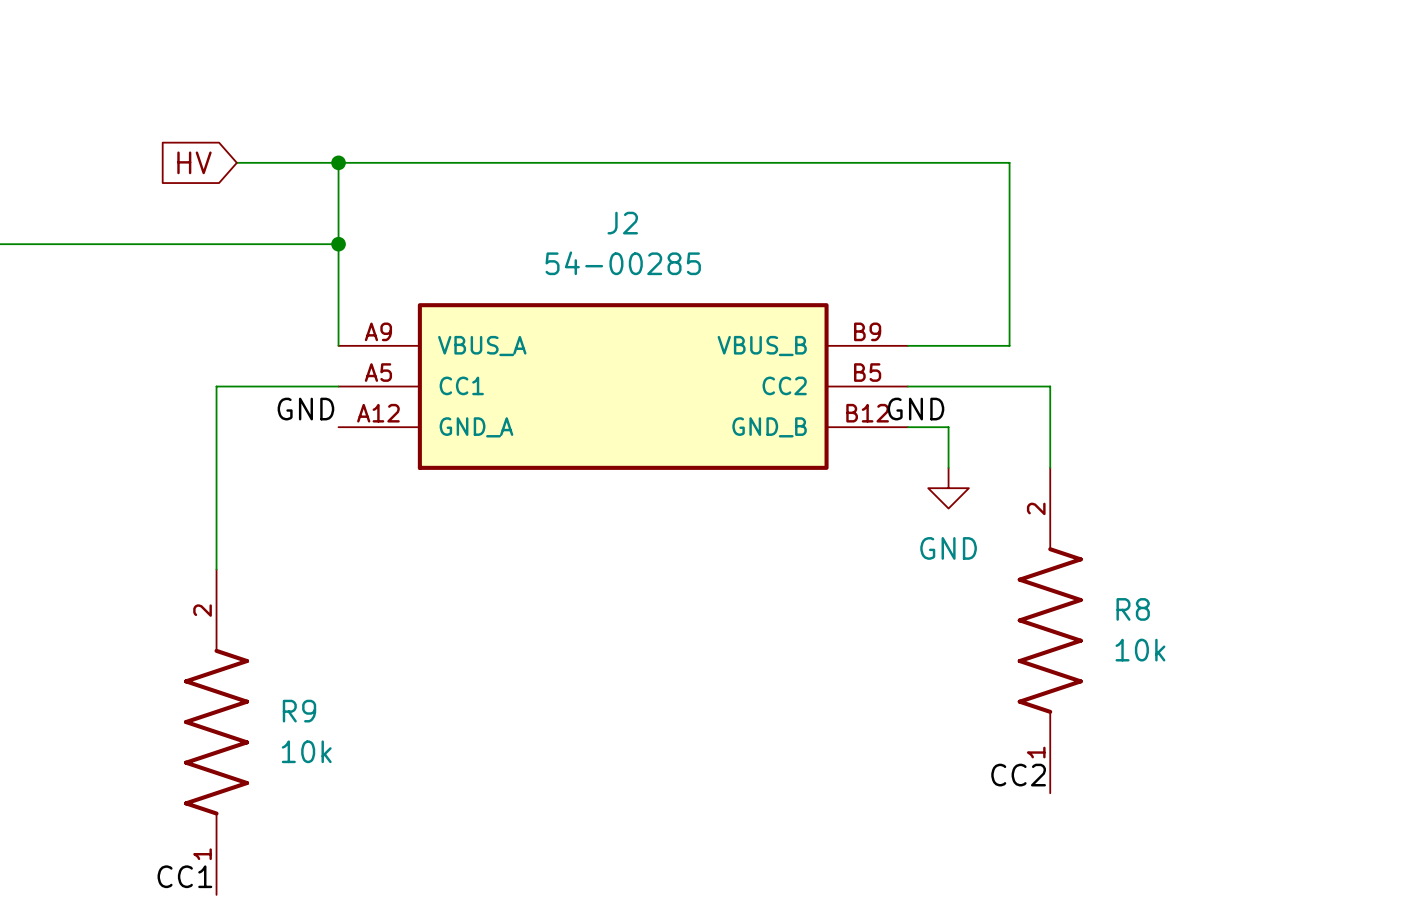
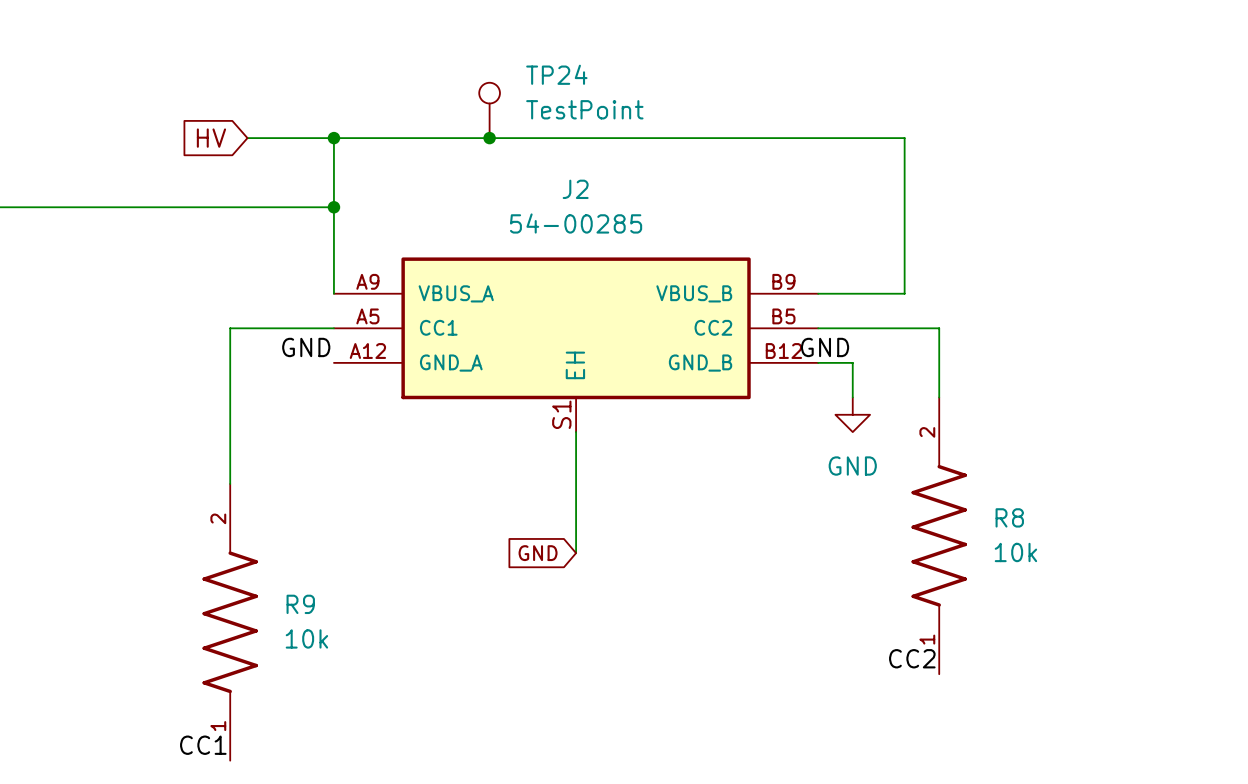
TP24: none -> TestPoint (489, 110)
junction: none -> (489, 138)
J2 symbol: [338, 303, 908, 470] -> [333, 257, 819, 433]
wire: none -> (576, 432) (576, 553)
global label: none -> GND (538, 553)

